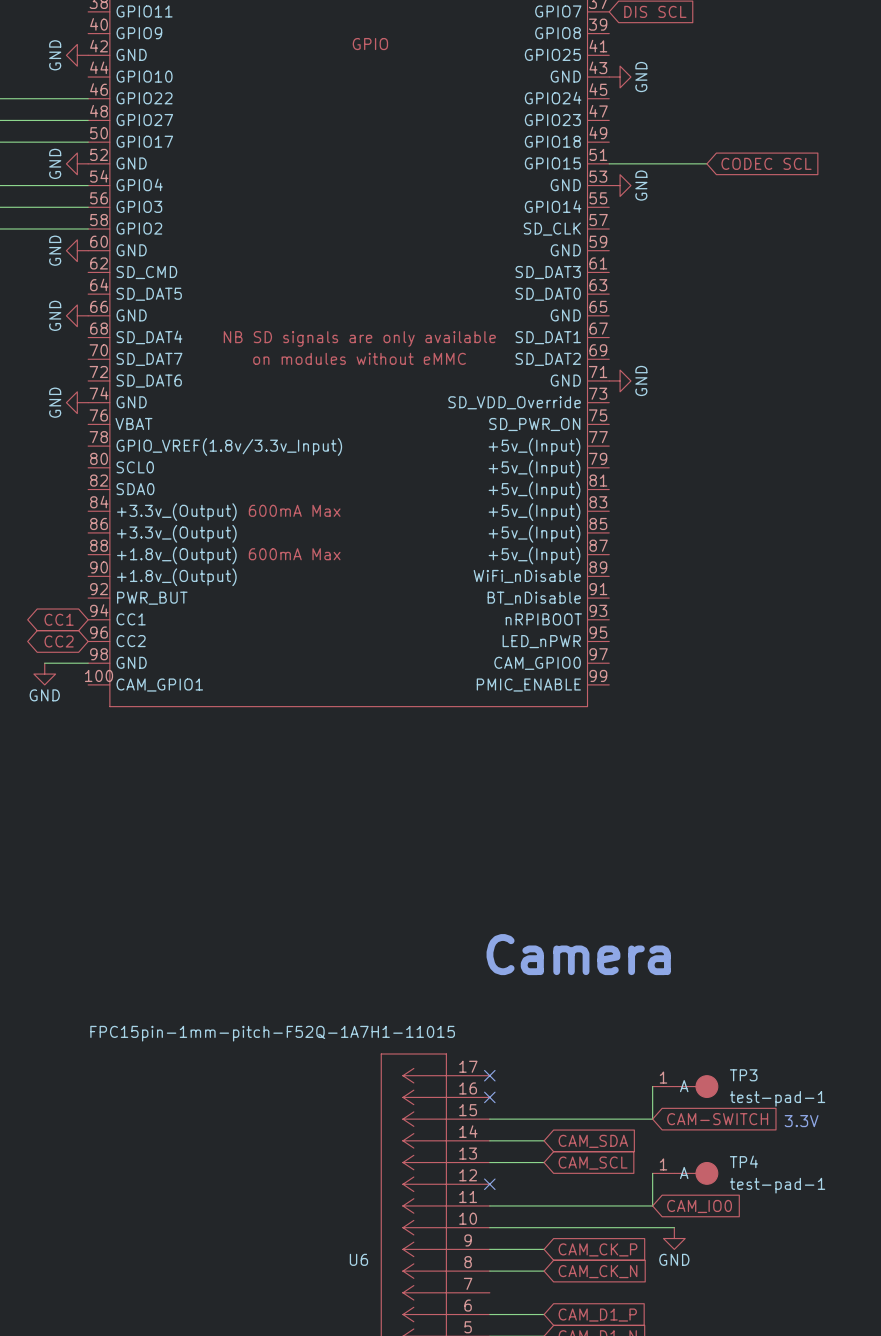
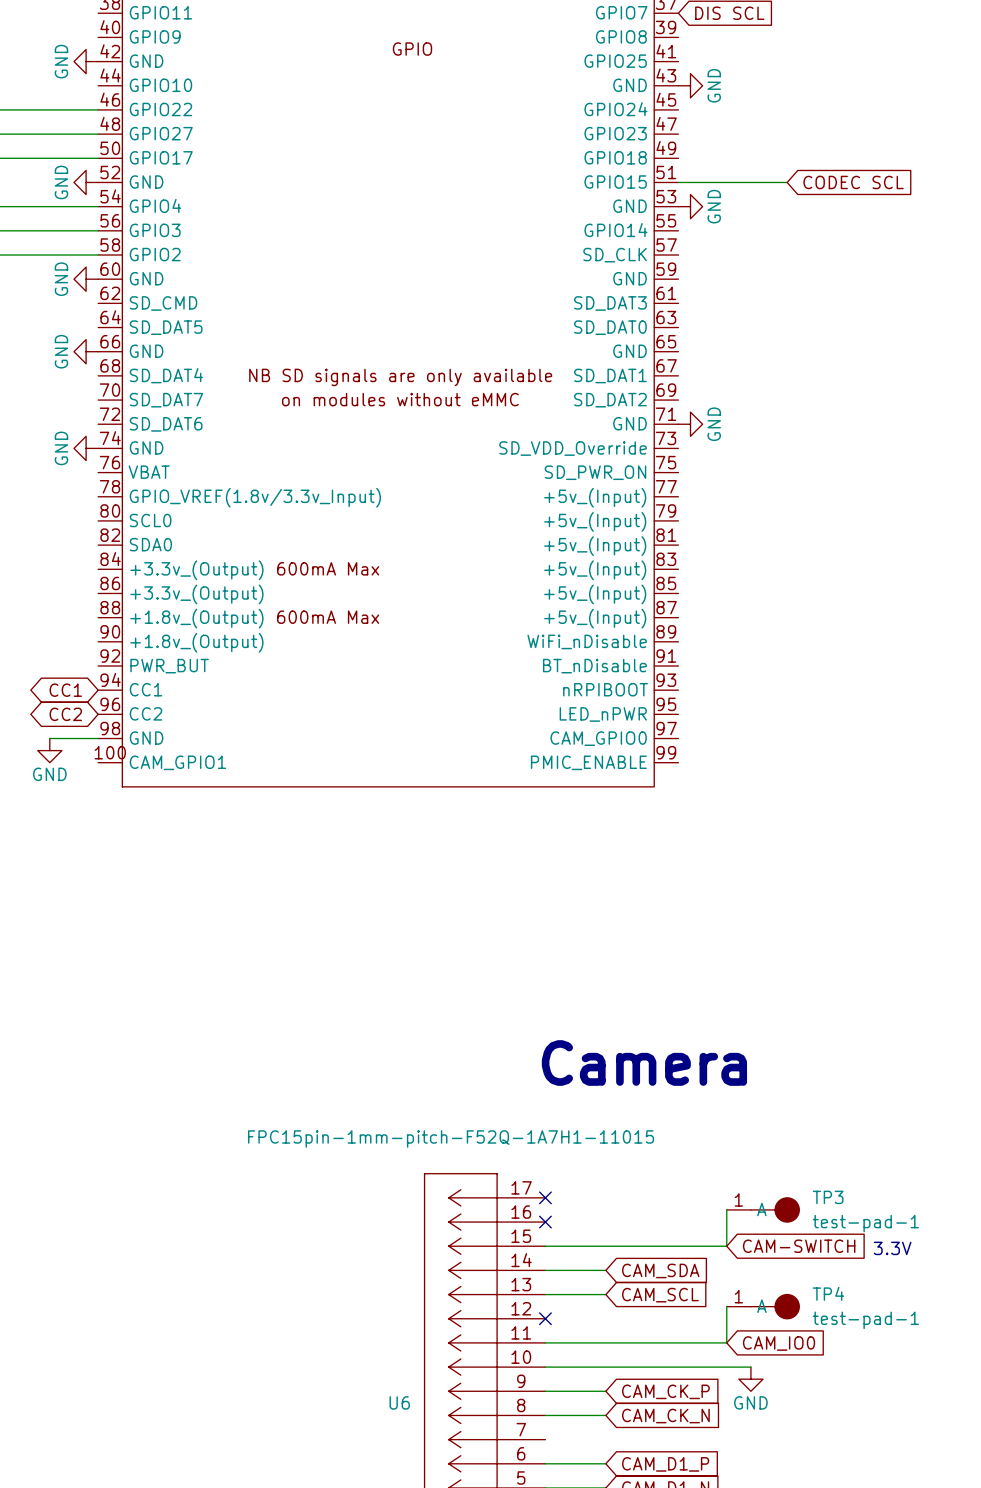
U6 value position: FPC15pin-1mm-pitch-F52Q-1A7H1-11015 (272, 1033) -> FPC15pin-1mm-pitch-F52Q-1A7H1-11015 (451, 1138)

